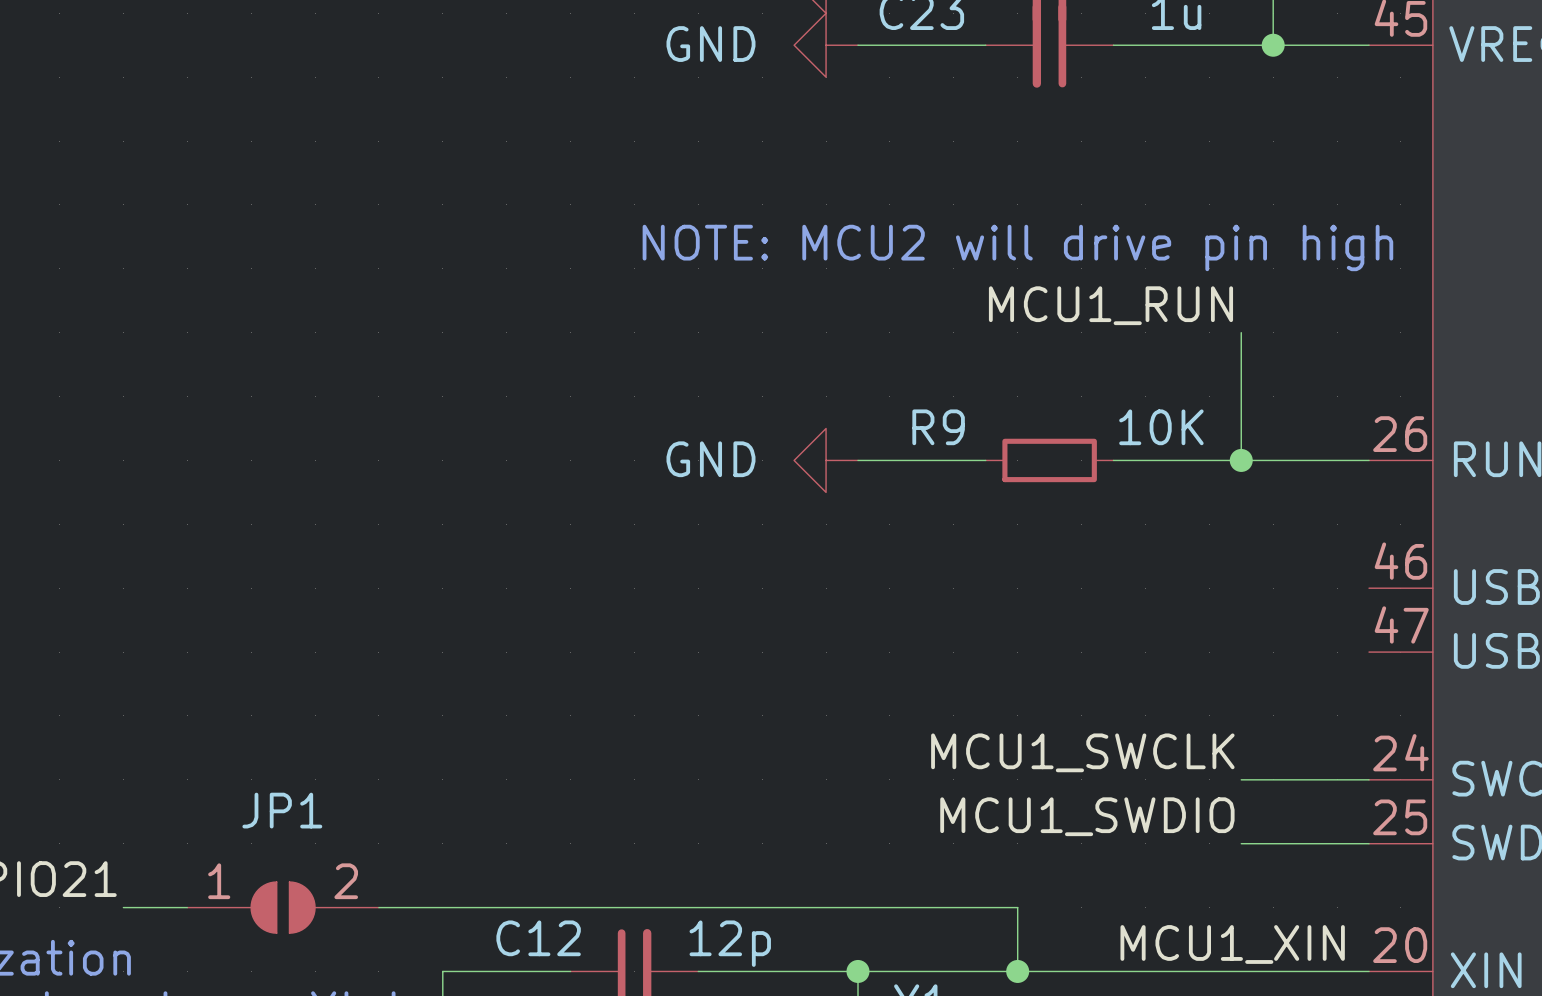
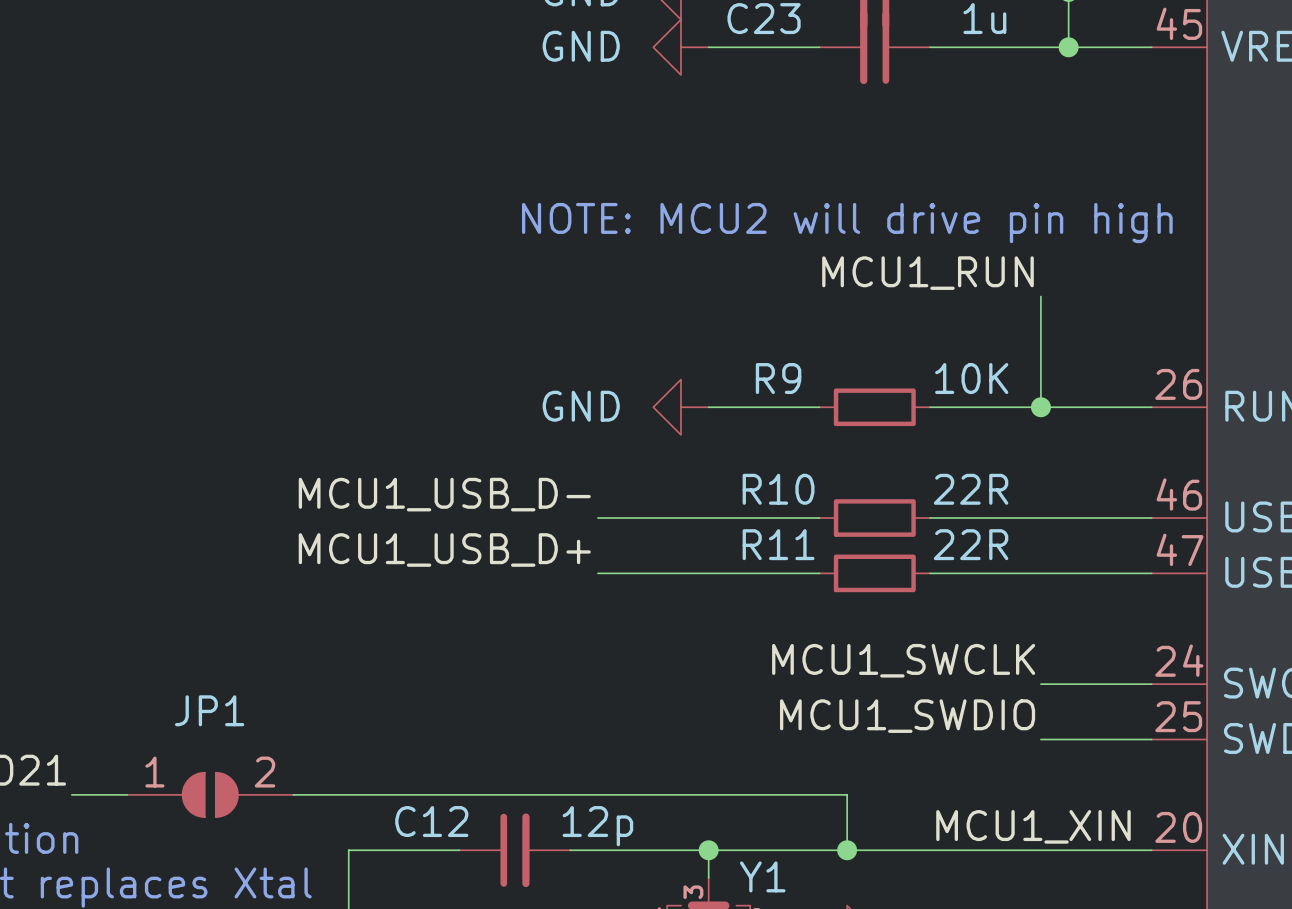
label: none -> MCU1_USB_D- (444, 494)
wire: none -> (597, 518) (819, 518)
R10: none -> 22R (874, 518)
wire: none -> (930, 518) (1151, 518)
label: none -> MCU1_USB_D+ (444, 549)
wire: none -> (597, 573) (819, 573)
R11: none -> 22R (874, 573)
wire: none -> (930, 573) (1151, 573)

